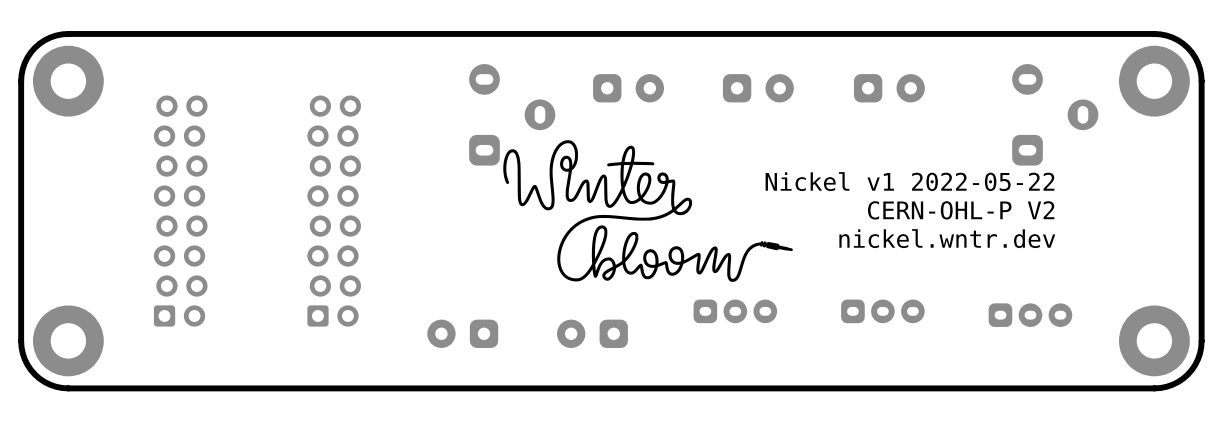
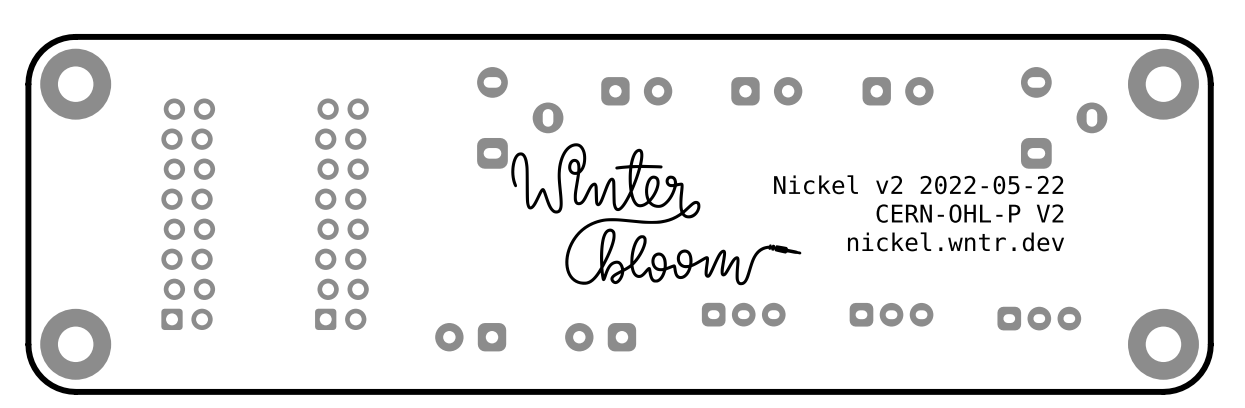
text: Nickel v1 2022-05-22 (910, 181) -> Nickel v2 2022-05-22 (918, 184)

